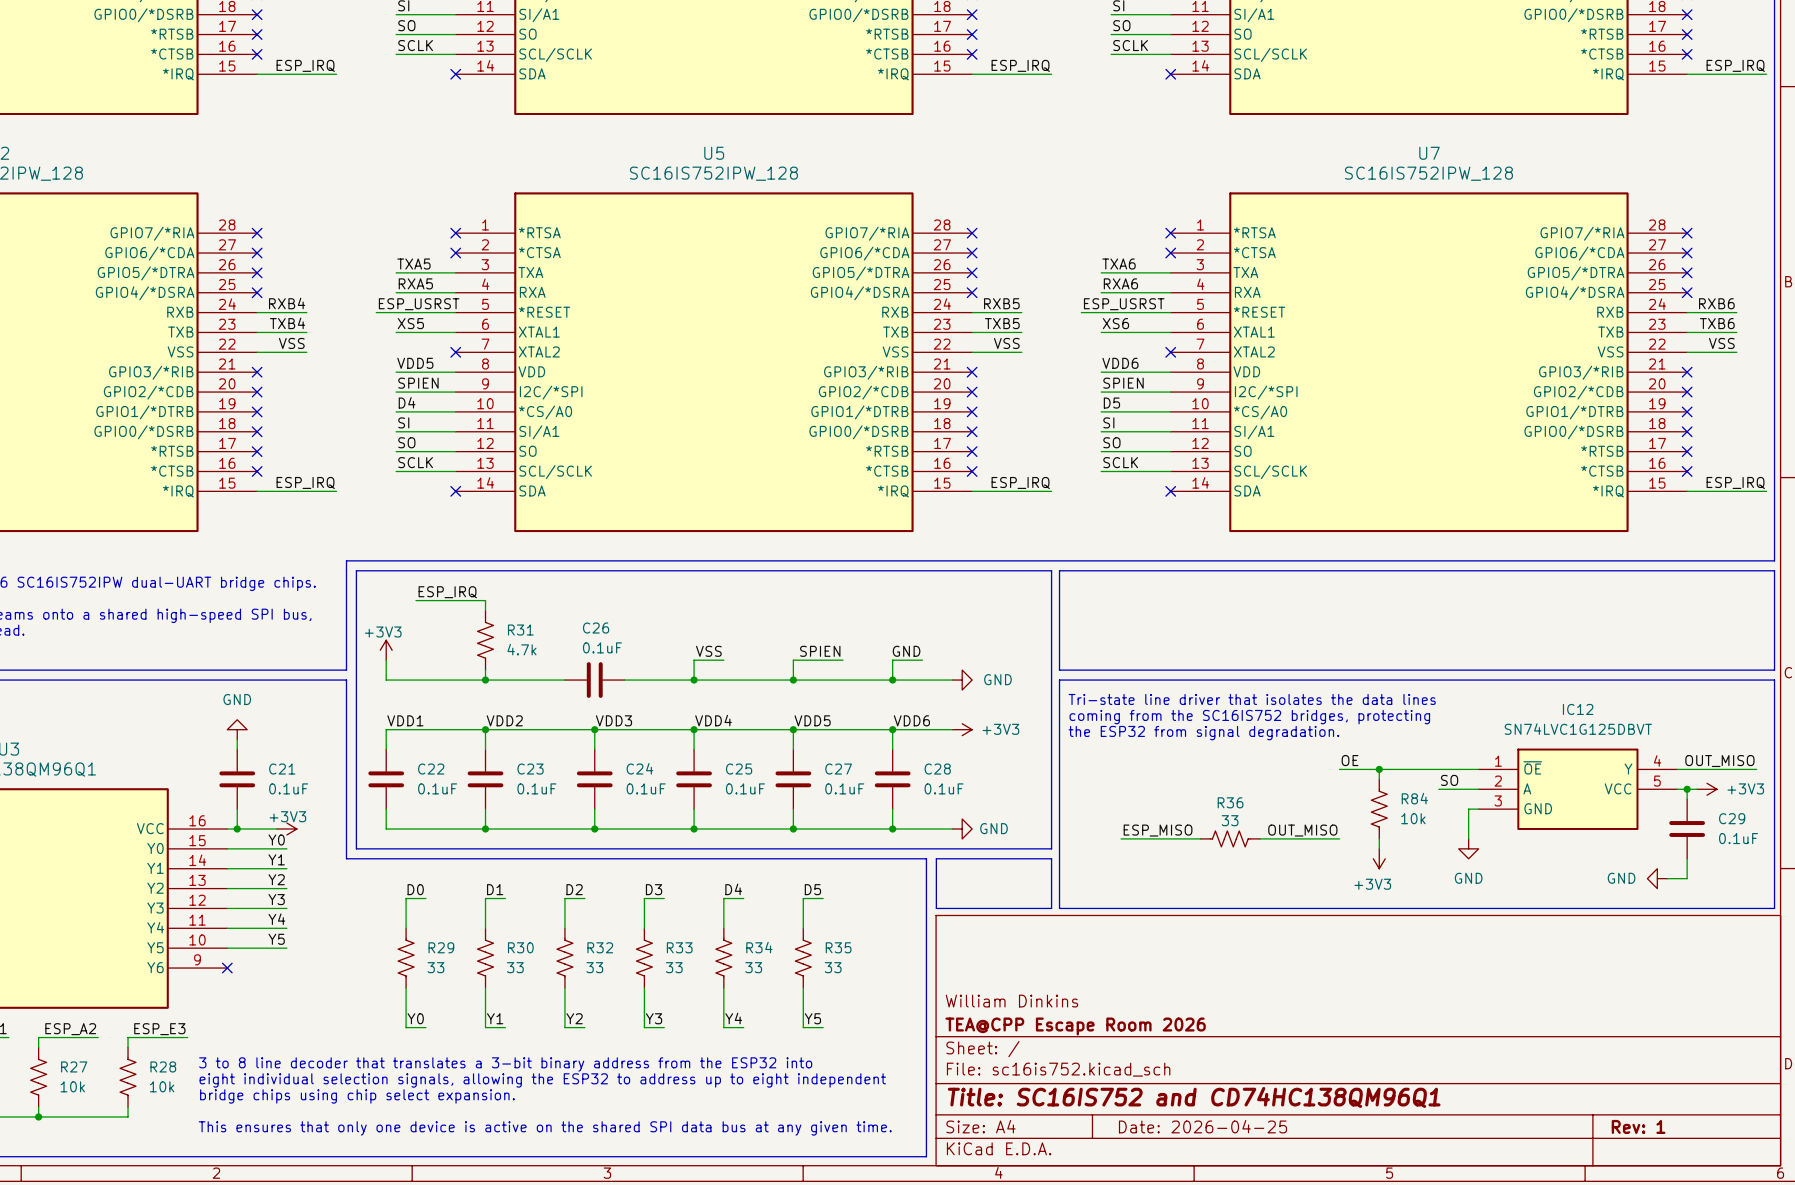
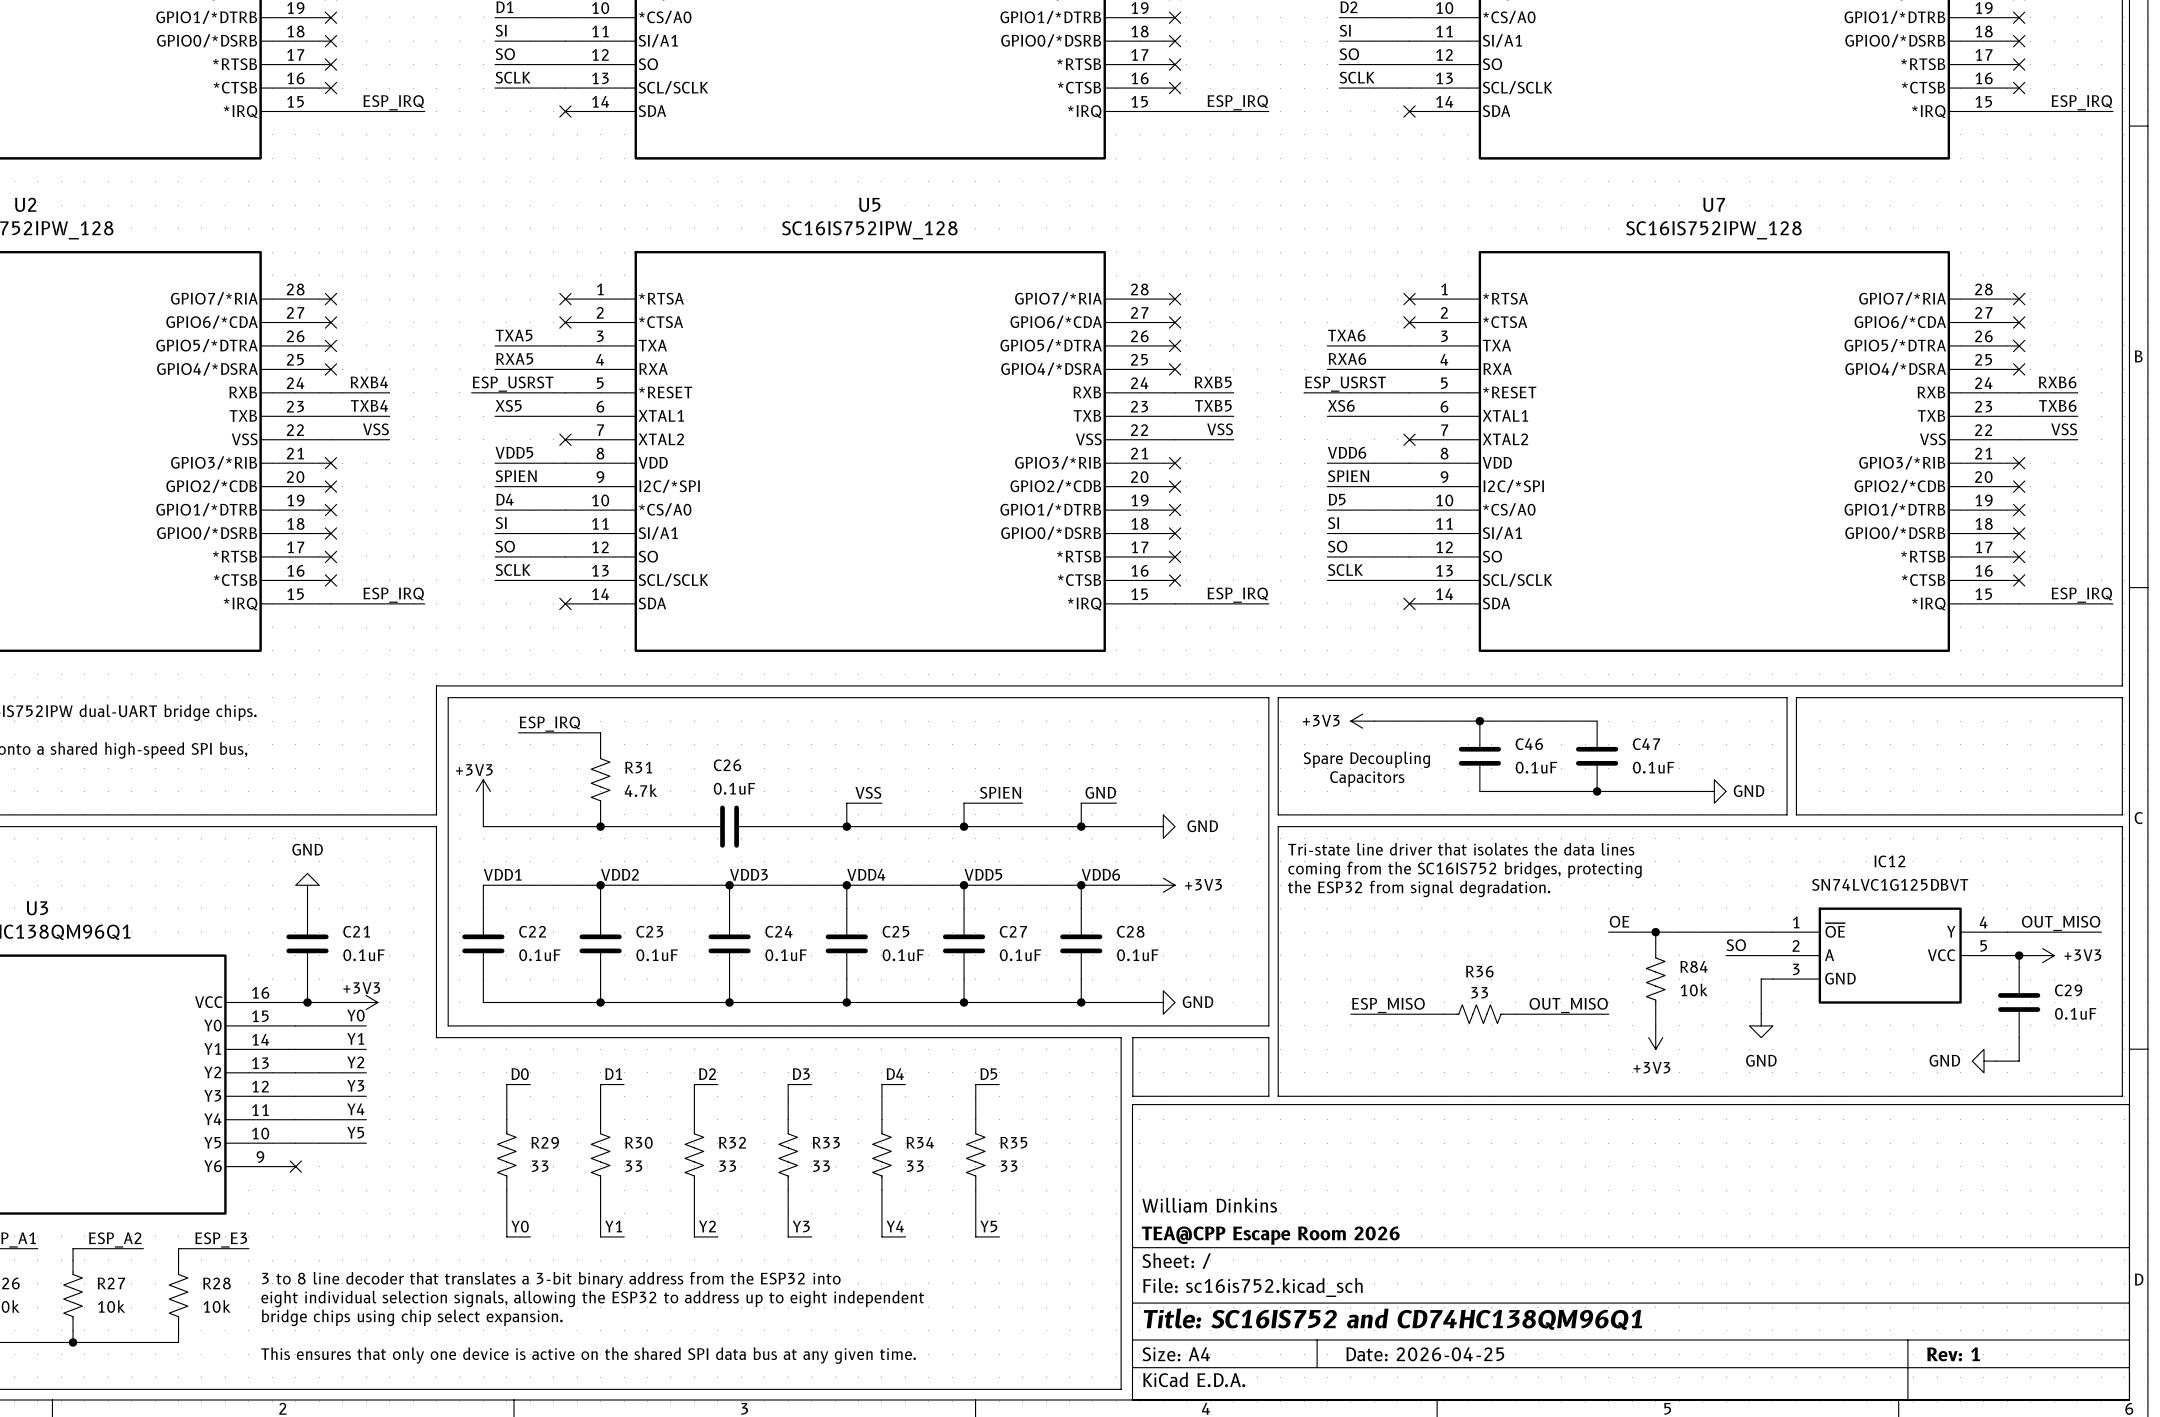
line: (1490, 570) (1498, 570) -> (1787, 697) (1787, 814)
power symbol: none -> +3V3 (1362, 721)
wire: none -> (1374, 721) (1597, 721)
junction: none -> (1479, 721)
C46: none -> 0.1uF (1479, 756)
C47: none -> 0.1uF (1597, 756)
text: none -> Spare Decoupling (1366, 759)
text: none -> Capacitors (1367, 778)
wire: none -> (1479, 791) (1702, 791)
junction: none -> (1597, 791)
power symbol: none -> GND (1714, 791)
line: (1490, 670) (1498, 670) -> (1796, 697) (1796, 814)

